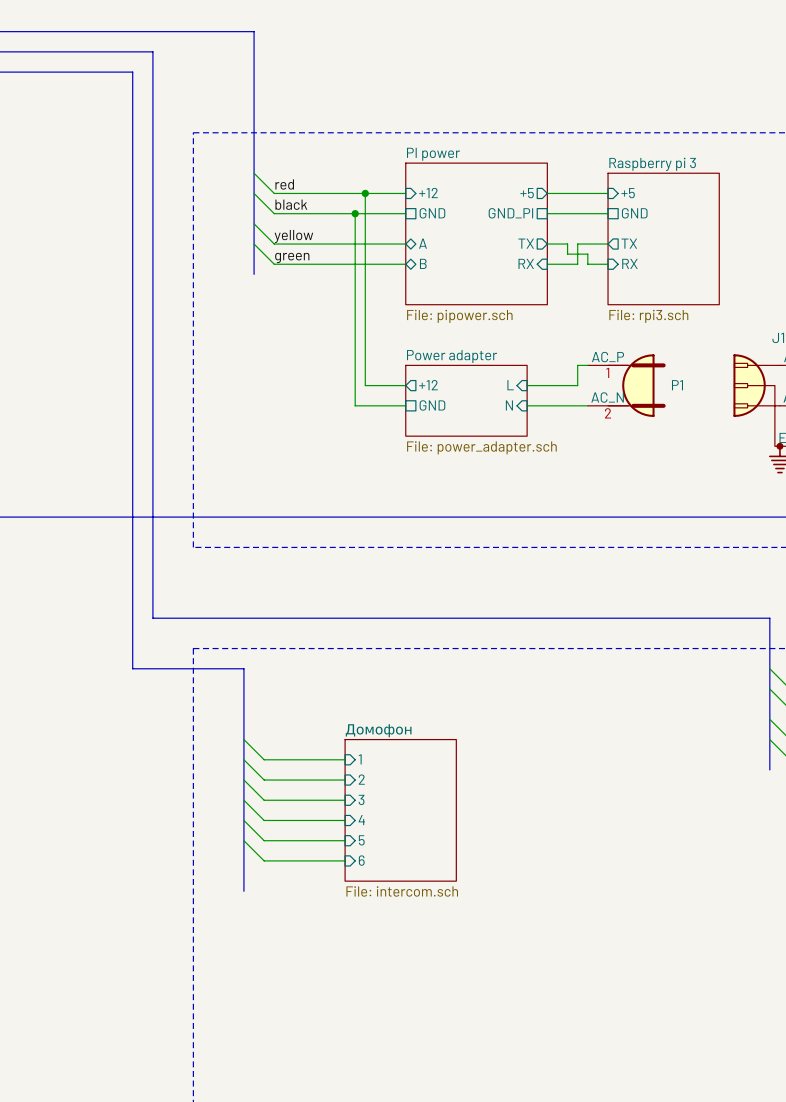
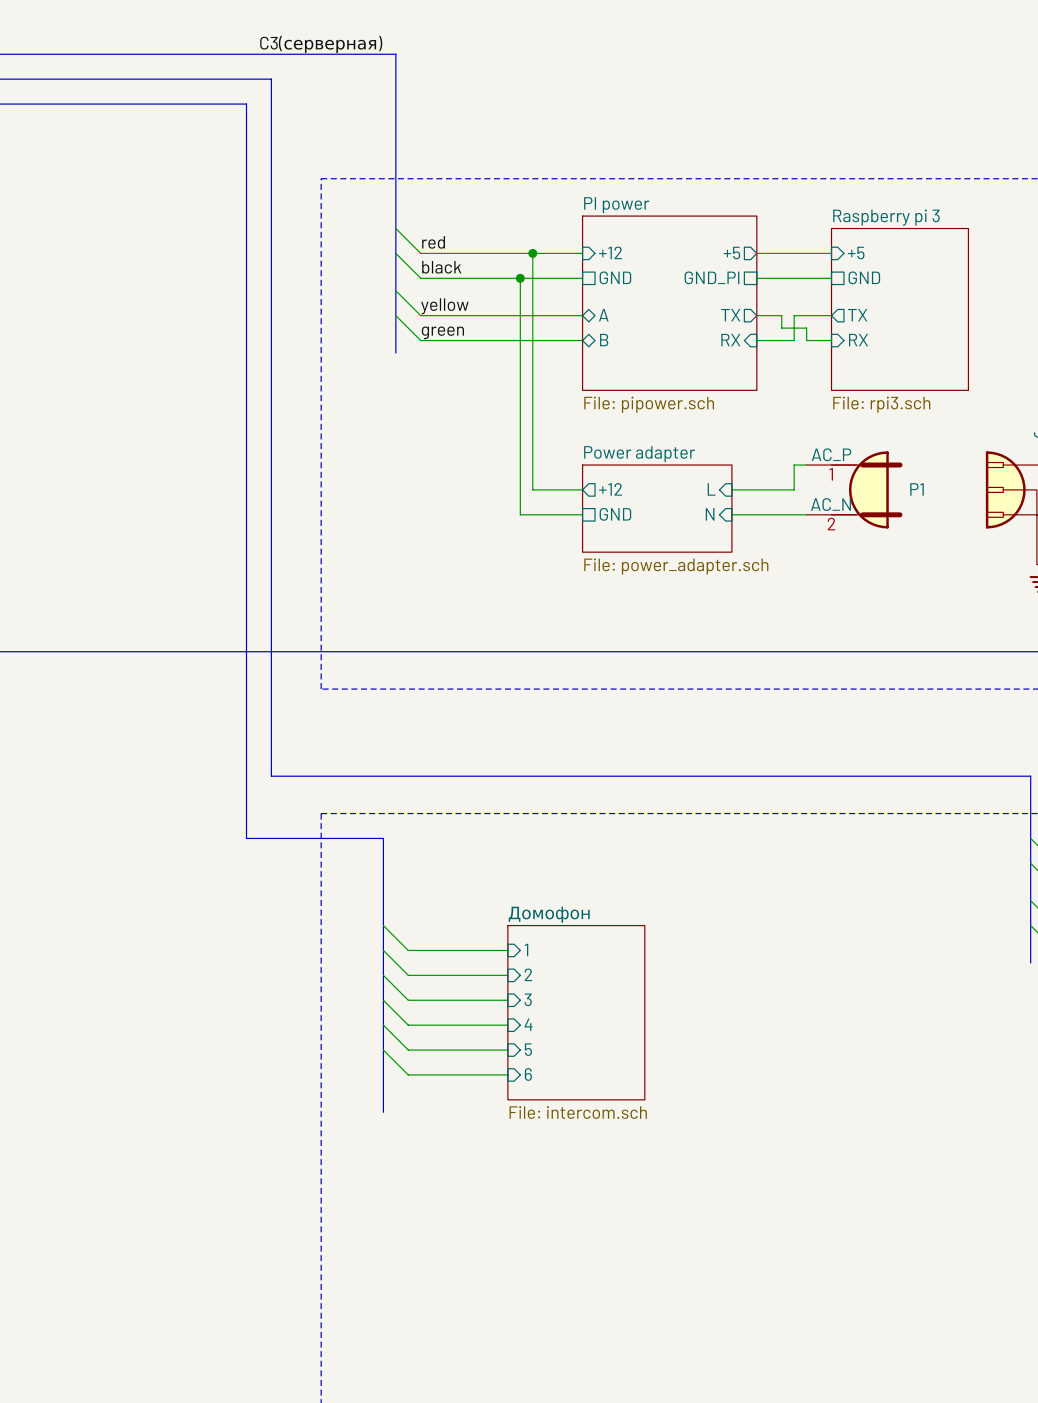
label: none -> C3(серверная) (321, 44)

